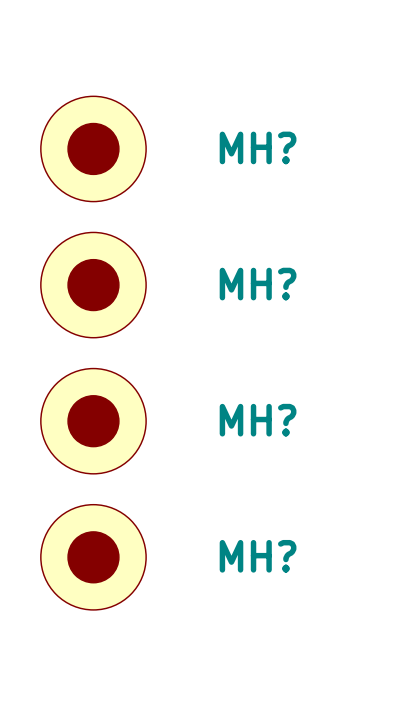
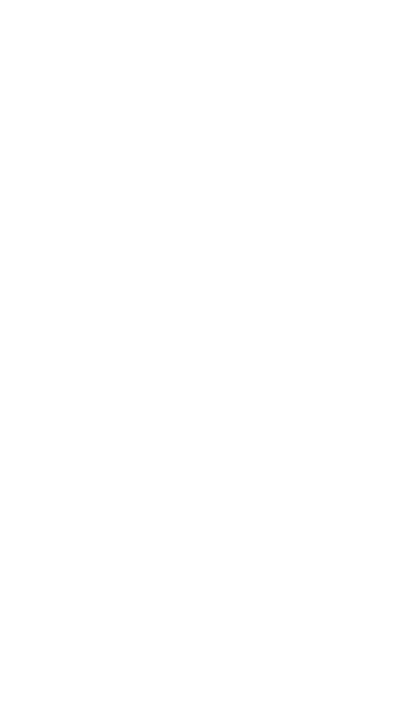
MH?: (93, 148) -> none
MH?: (93, 285) -> none
MH?: (93, 421) -> none
MH?: (93, 557) -> none

